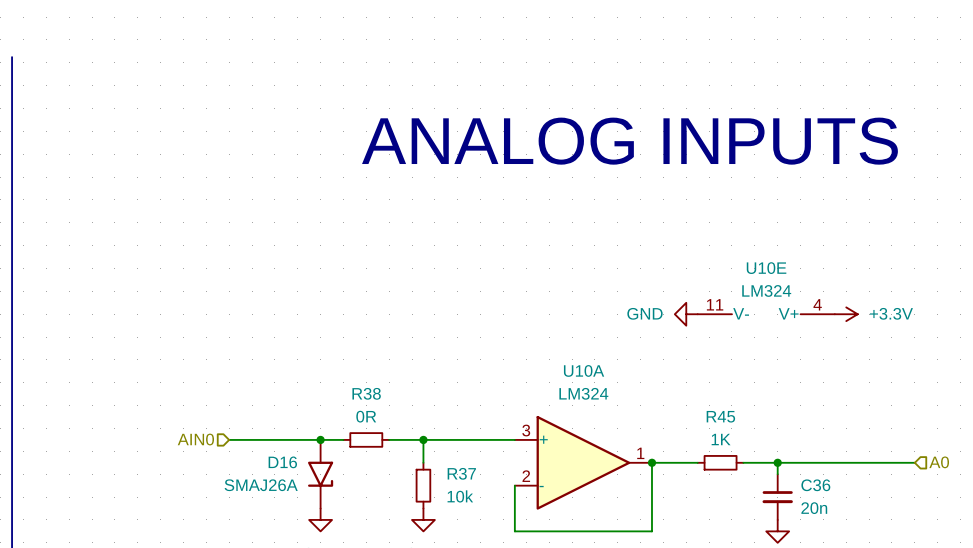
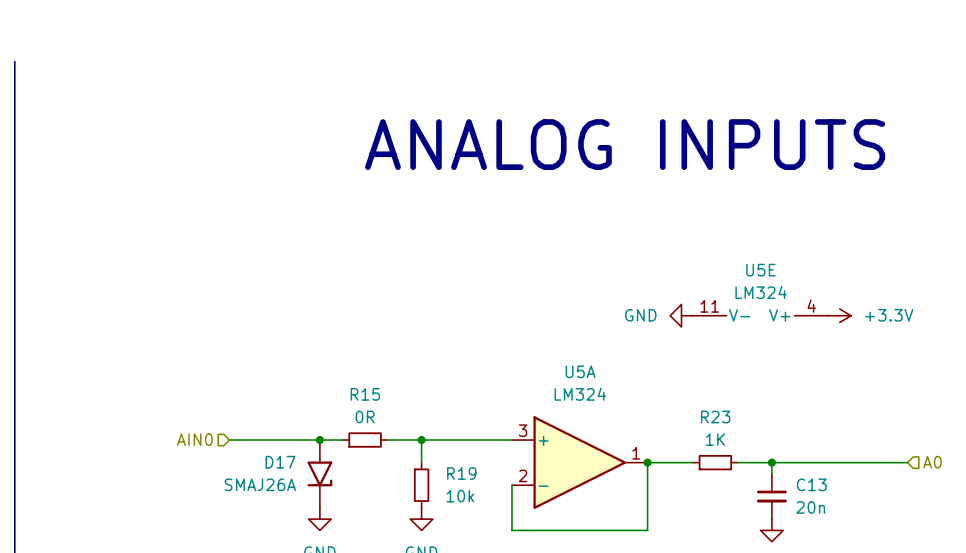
U10E name: U10E (766, 268) -> U5E (760, 270)
U10A name: U10A (584, 370) -> U5A (580, 371)
R38 name: R38 (366, 393) -> R15 (365, 394)
R45 name: R45 (720, 416) -> R23 (715, 417)
D16 name: D16 (282, 462) -> D17 (280, 462)
R37 name: R37 (461, 473) -> R19 (461, 473)
C36 name: C36 (815, 485) -> C13 (811, 484)

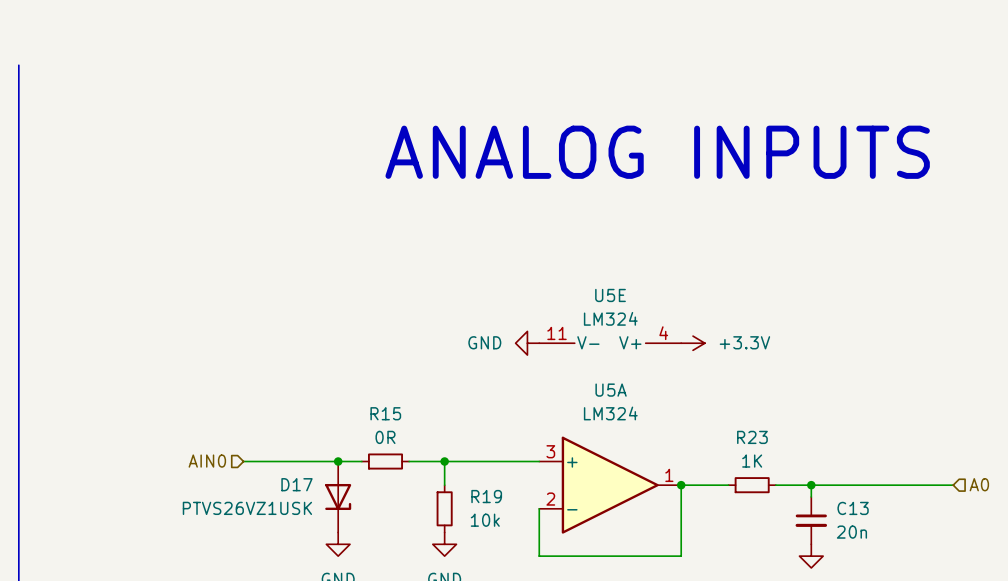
power symbol position: GND (681, 315) -> GND (527, 343)
U5E position: (760, 315) -> (610, 343)
power symbol position: +3.3V (839, 315) -> +3.3V (693, 343)
D17 symbol: [307, 440, 333, 508] -> [325, 461, 352, 533]
D17 value: SMAJ26A (260, 484) -> PTVS26VZ1USK (247, 508)

